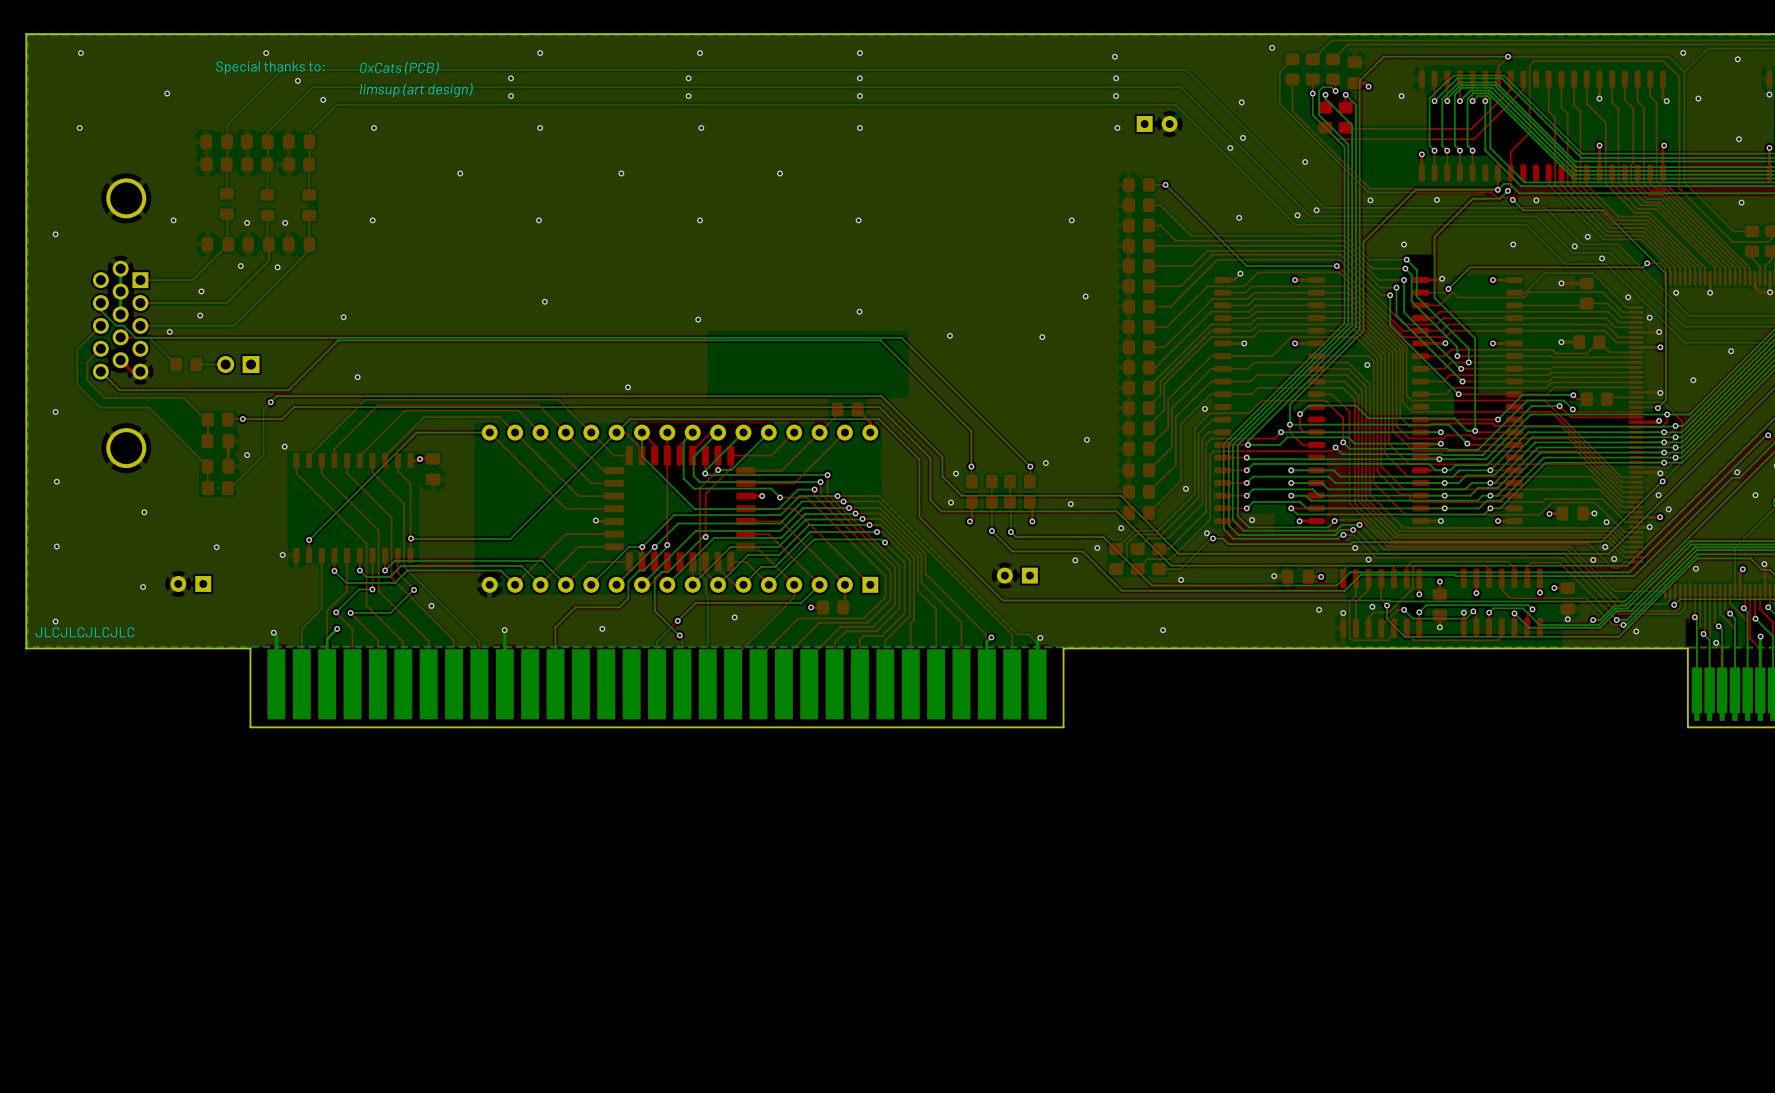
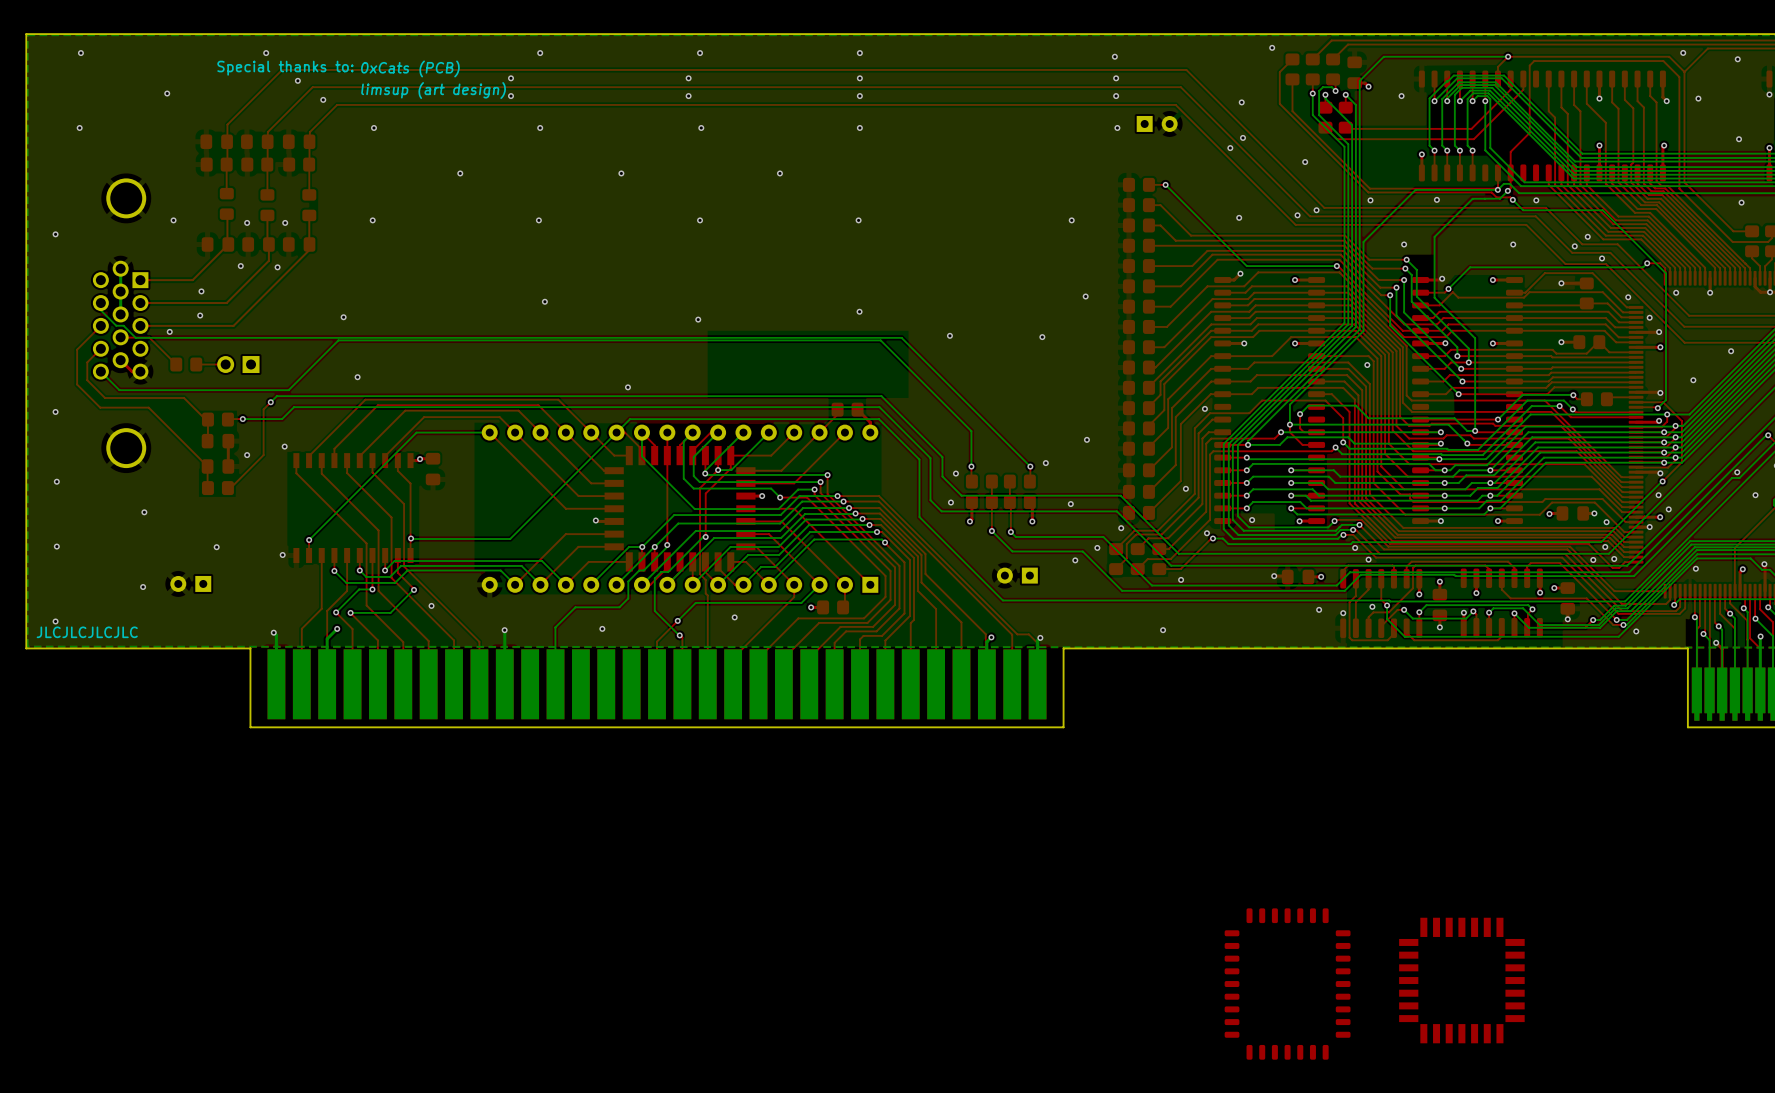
part: none -> (1461, 980)
part: none -> (1287, 984)

